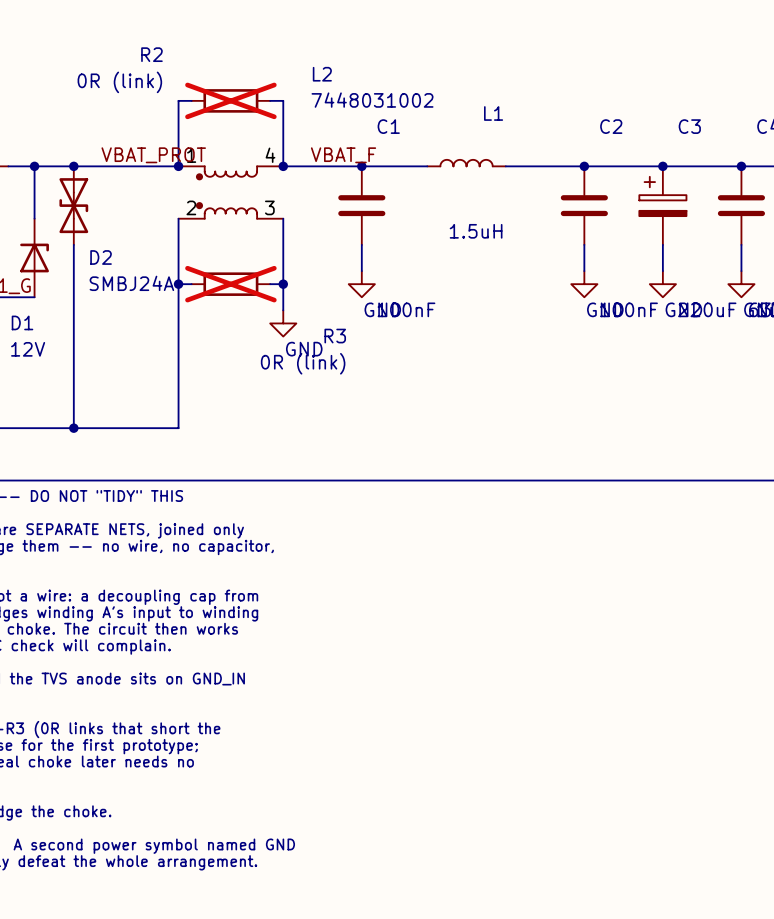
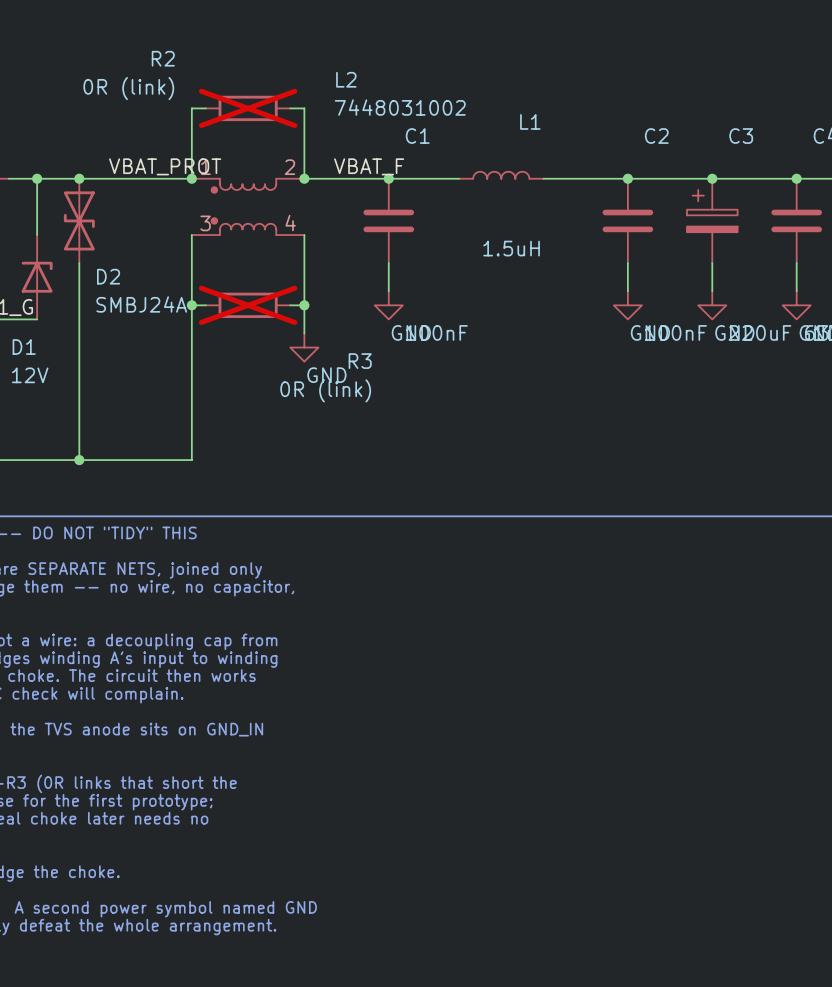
L2 pin number: 4 (270, 155) -> 2 (289, 167)
L2 pin number: 2 (191, 207) -> 3 (205, 223)
L2 pin number: 3 (269, 207) -> 4 (290, 223)

